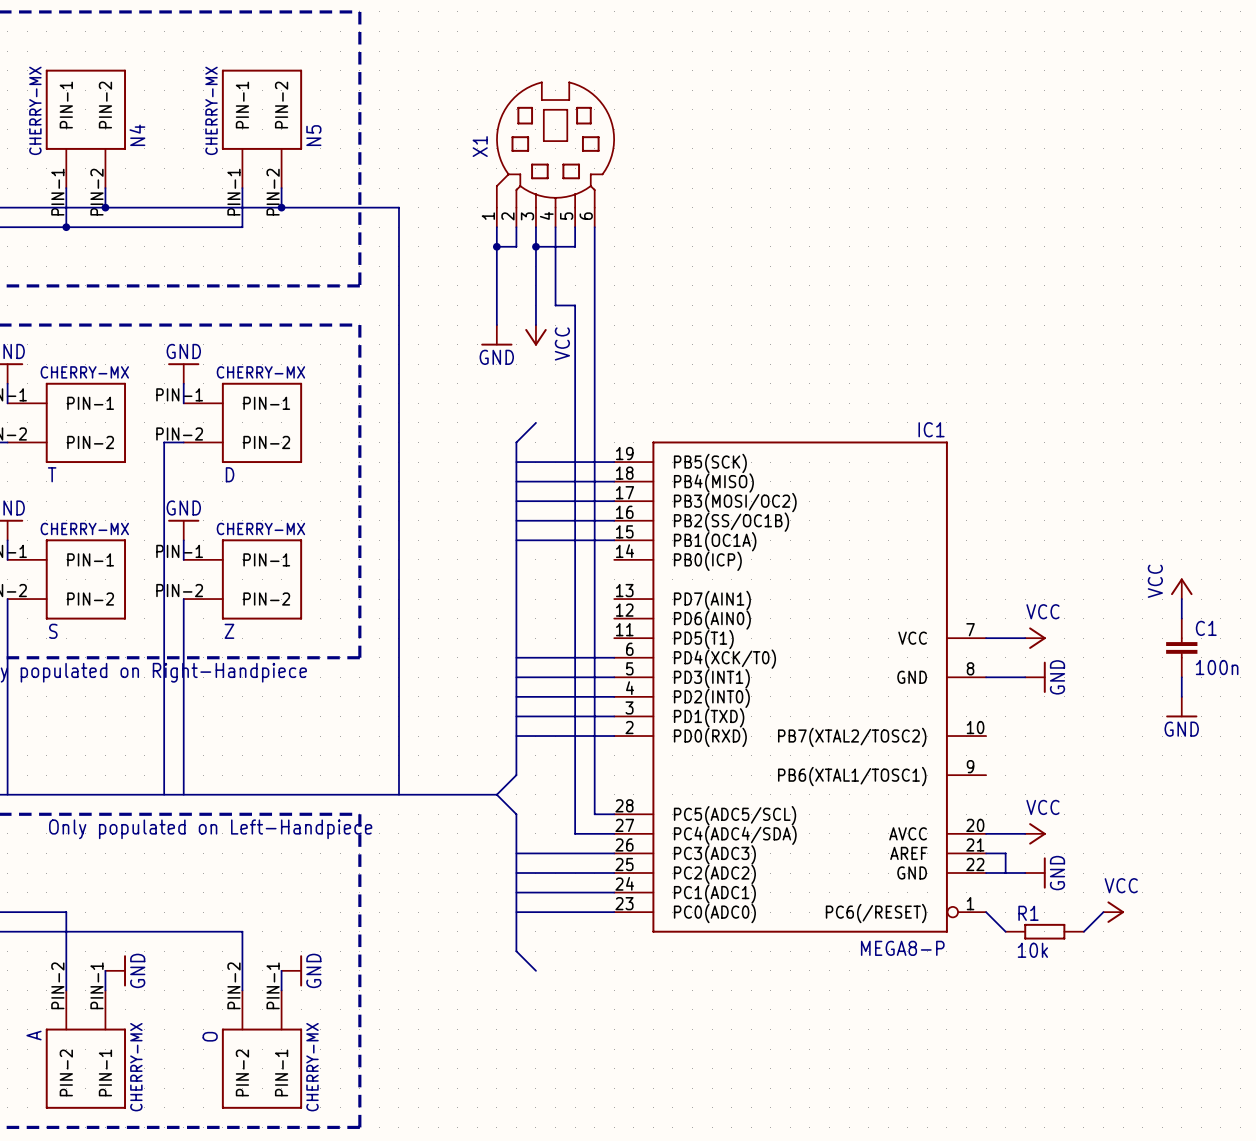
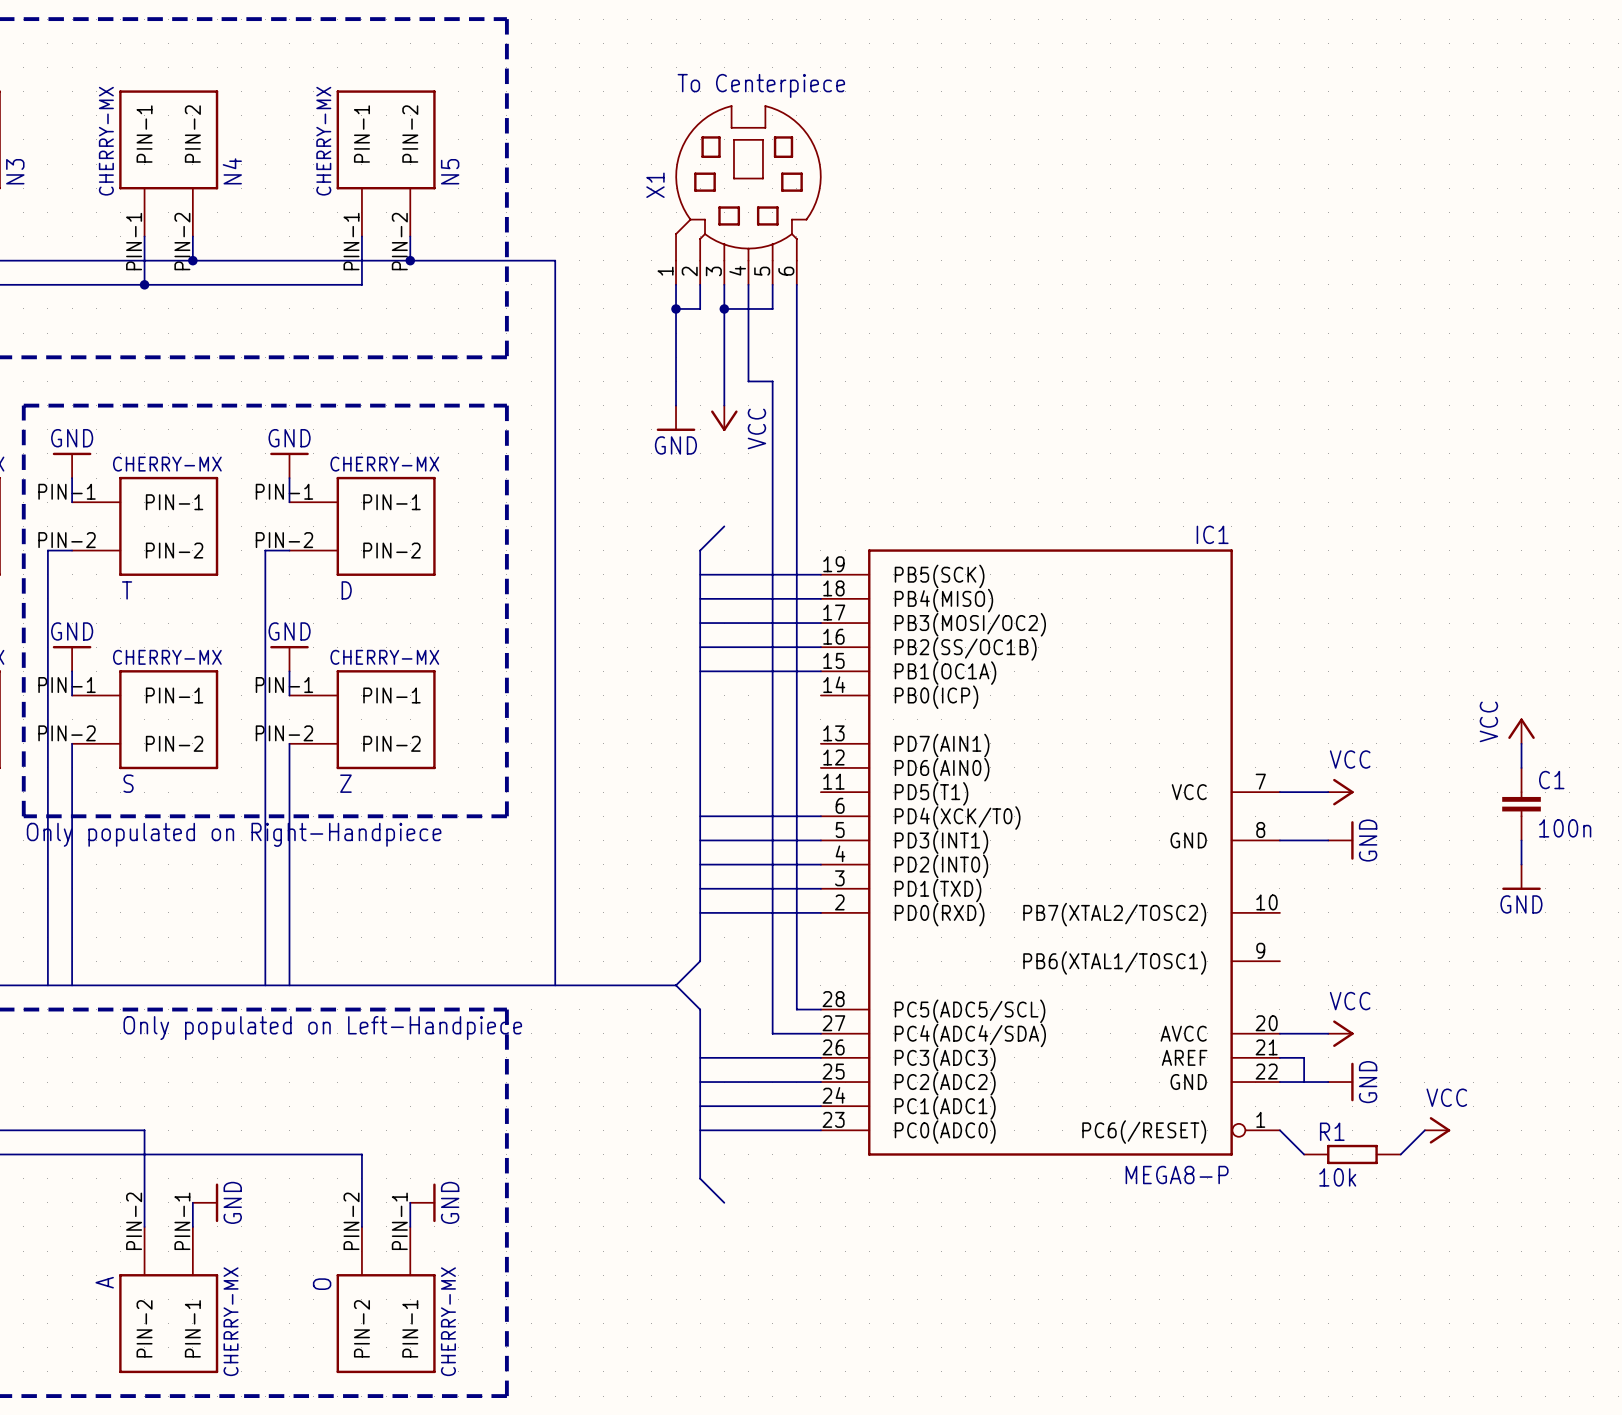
text: none -> To Centerpiece (761, 85)

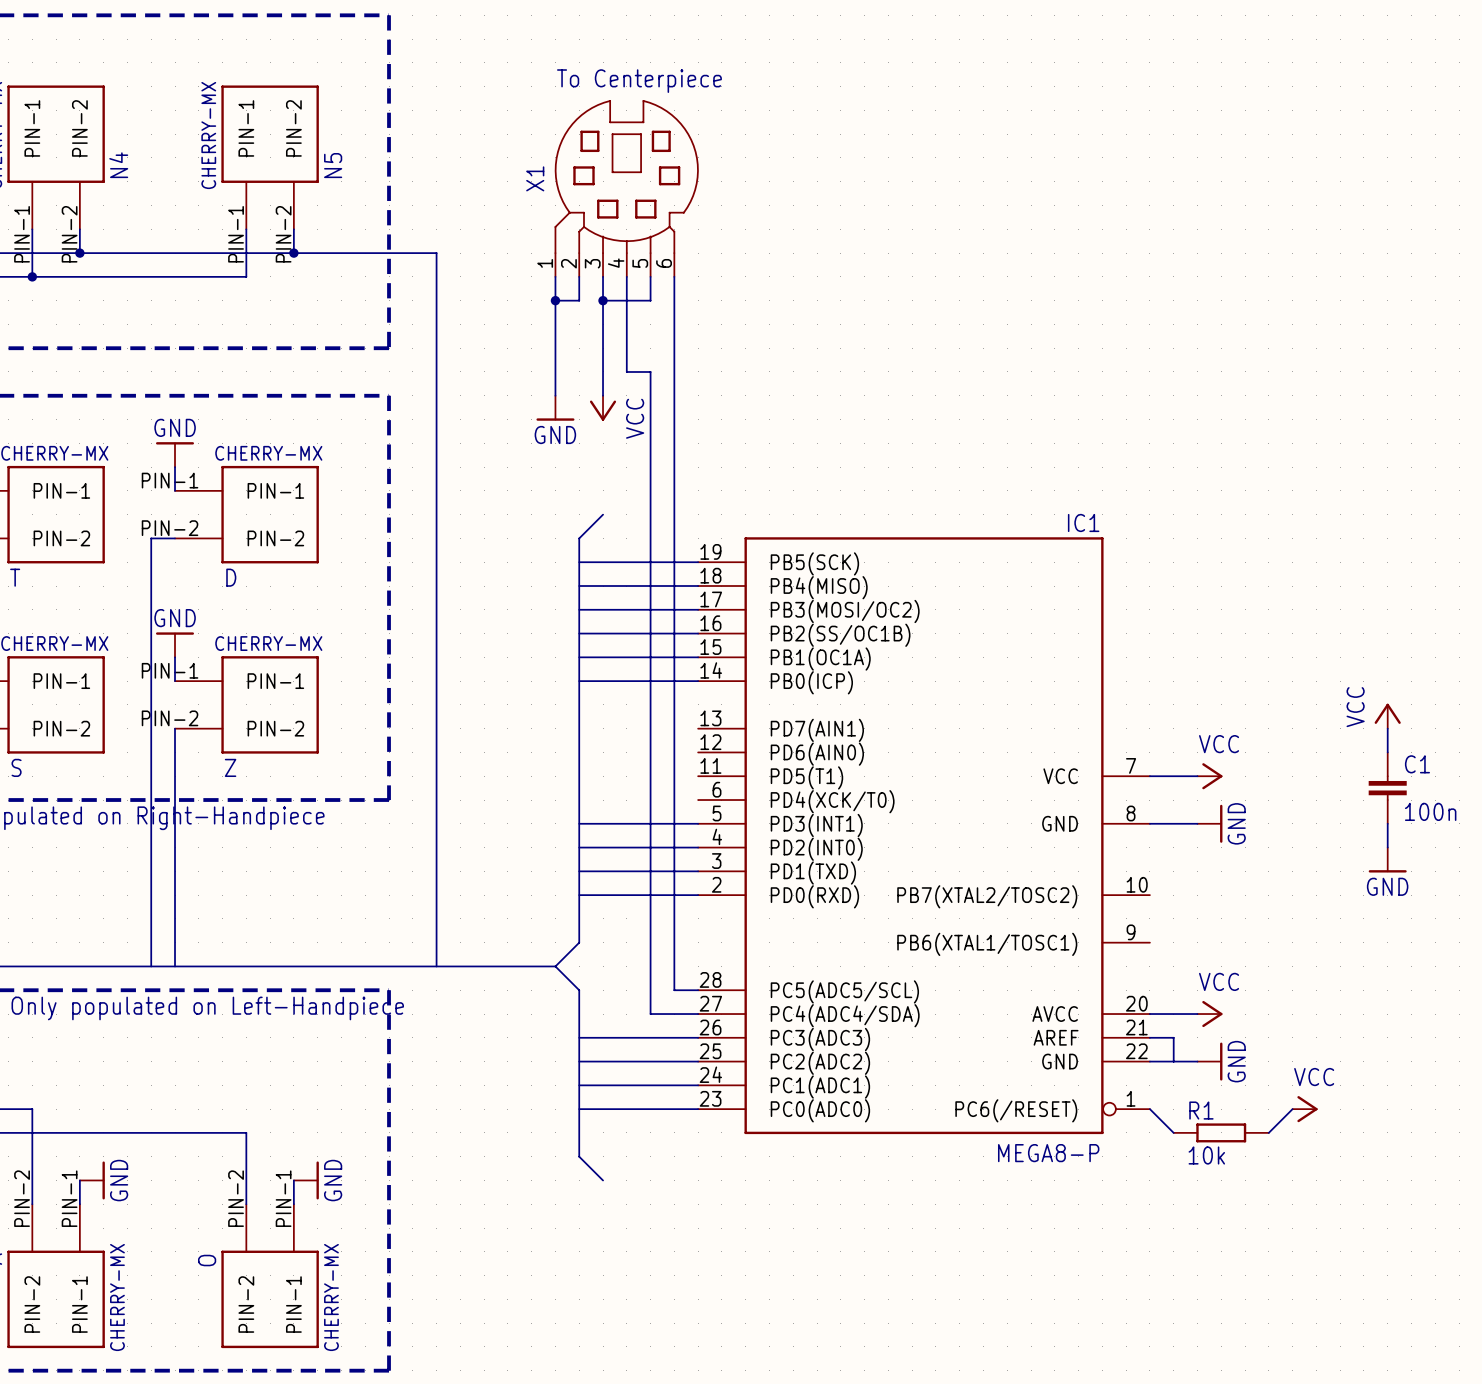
wire: (700, 816) (820, 816) -> (579, 681) (698, 681)

